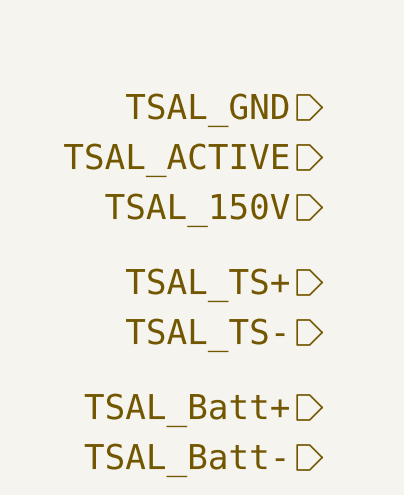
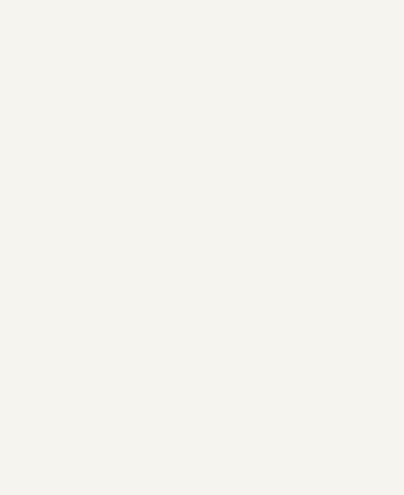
hierarchical label: TSAL_GND (207, 110) -> none
hierarchical label: TSAL_ACTIVE (176, 160) -> none
hierarchical label: TSAL_150V (197, 210) -> none
hierarchical label: TSAL_TS+ (207, 285) -> none
hierarchical label: TSAL_TS- (205, 335) -> none
hierarchical label: TSAL_Batt+ (186, 410) -> none
hierarchical label: TSAL_Batt- (184, 460) -> none

